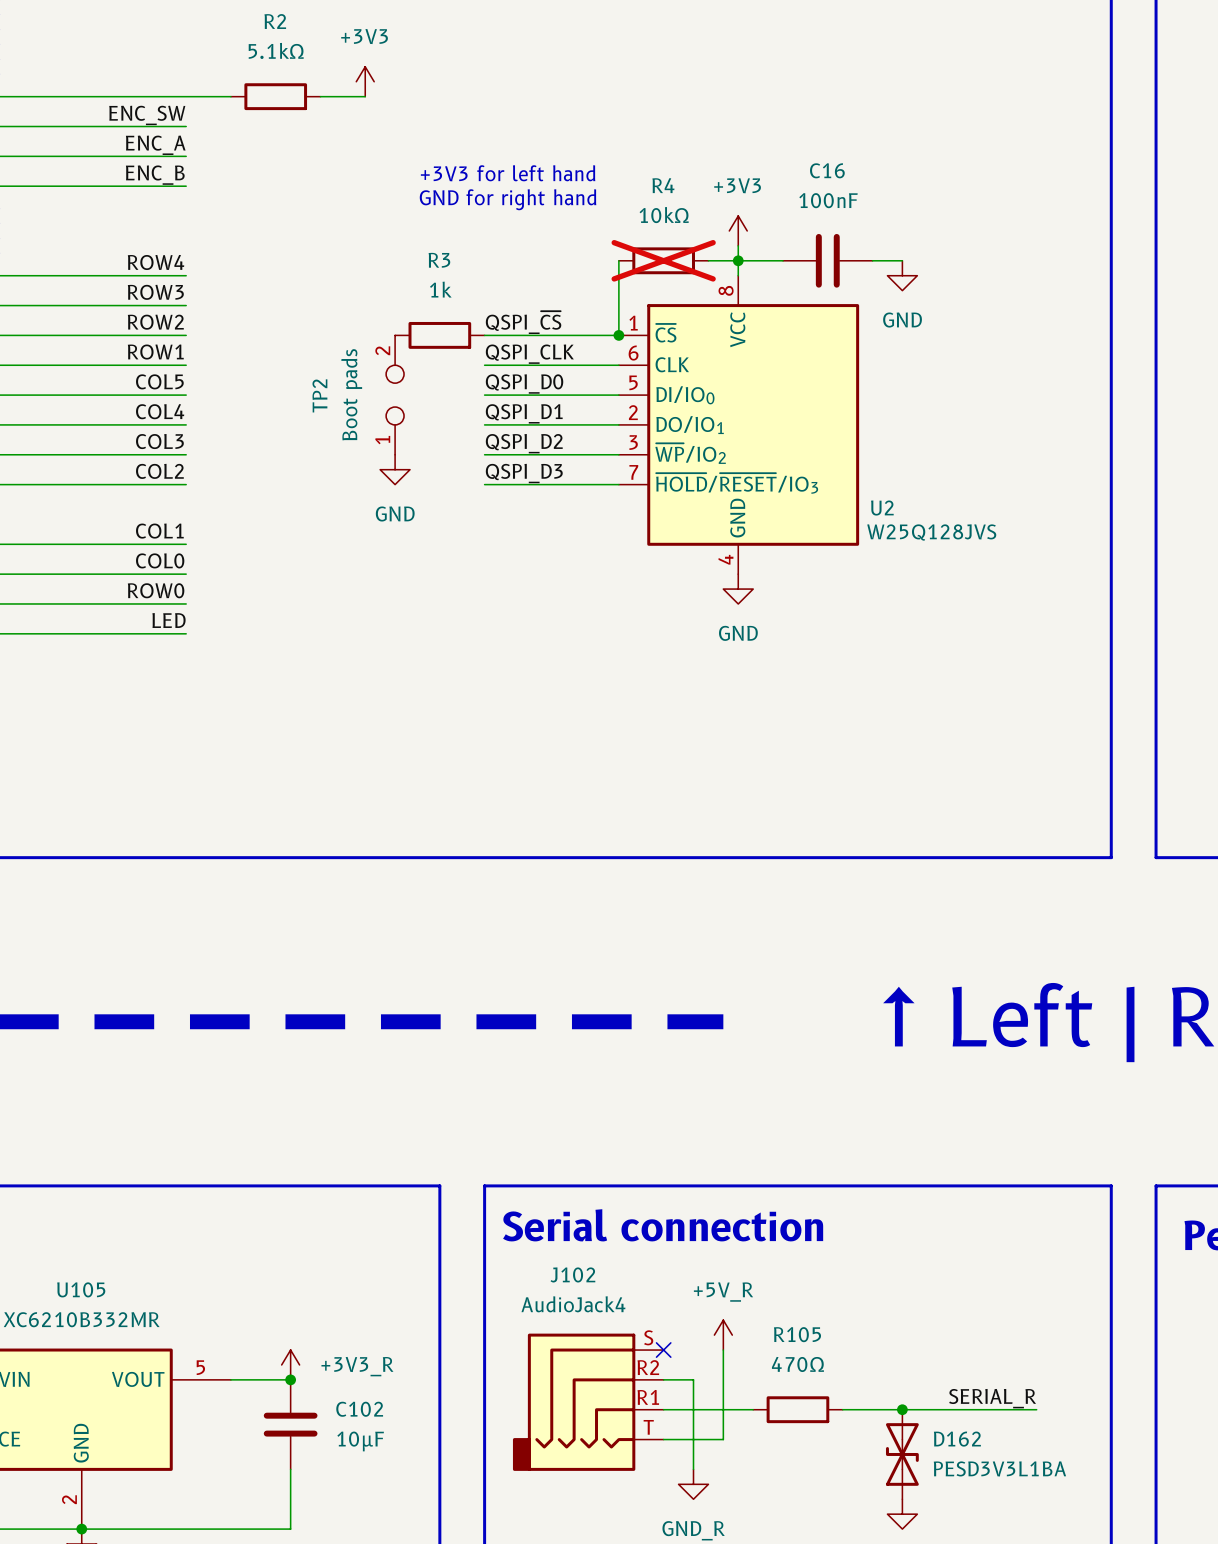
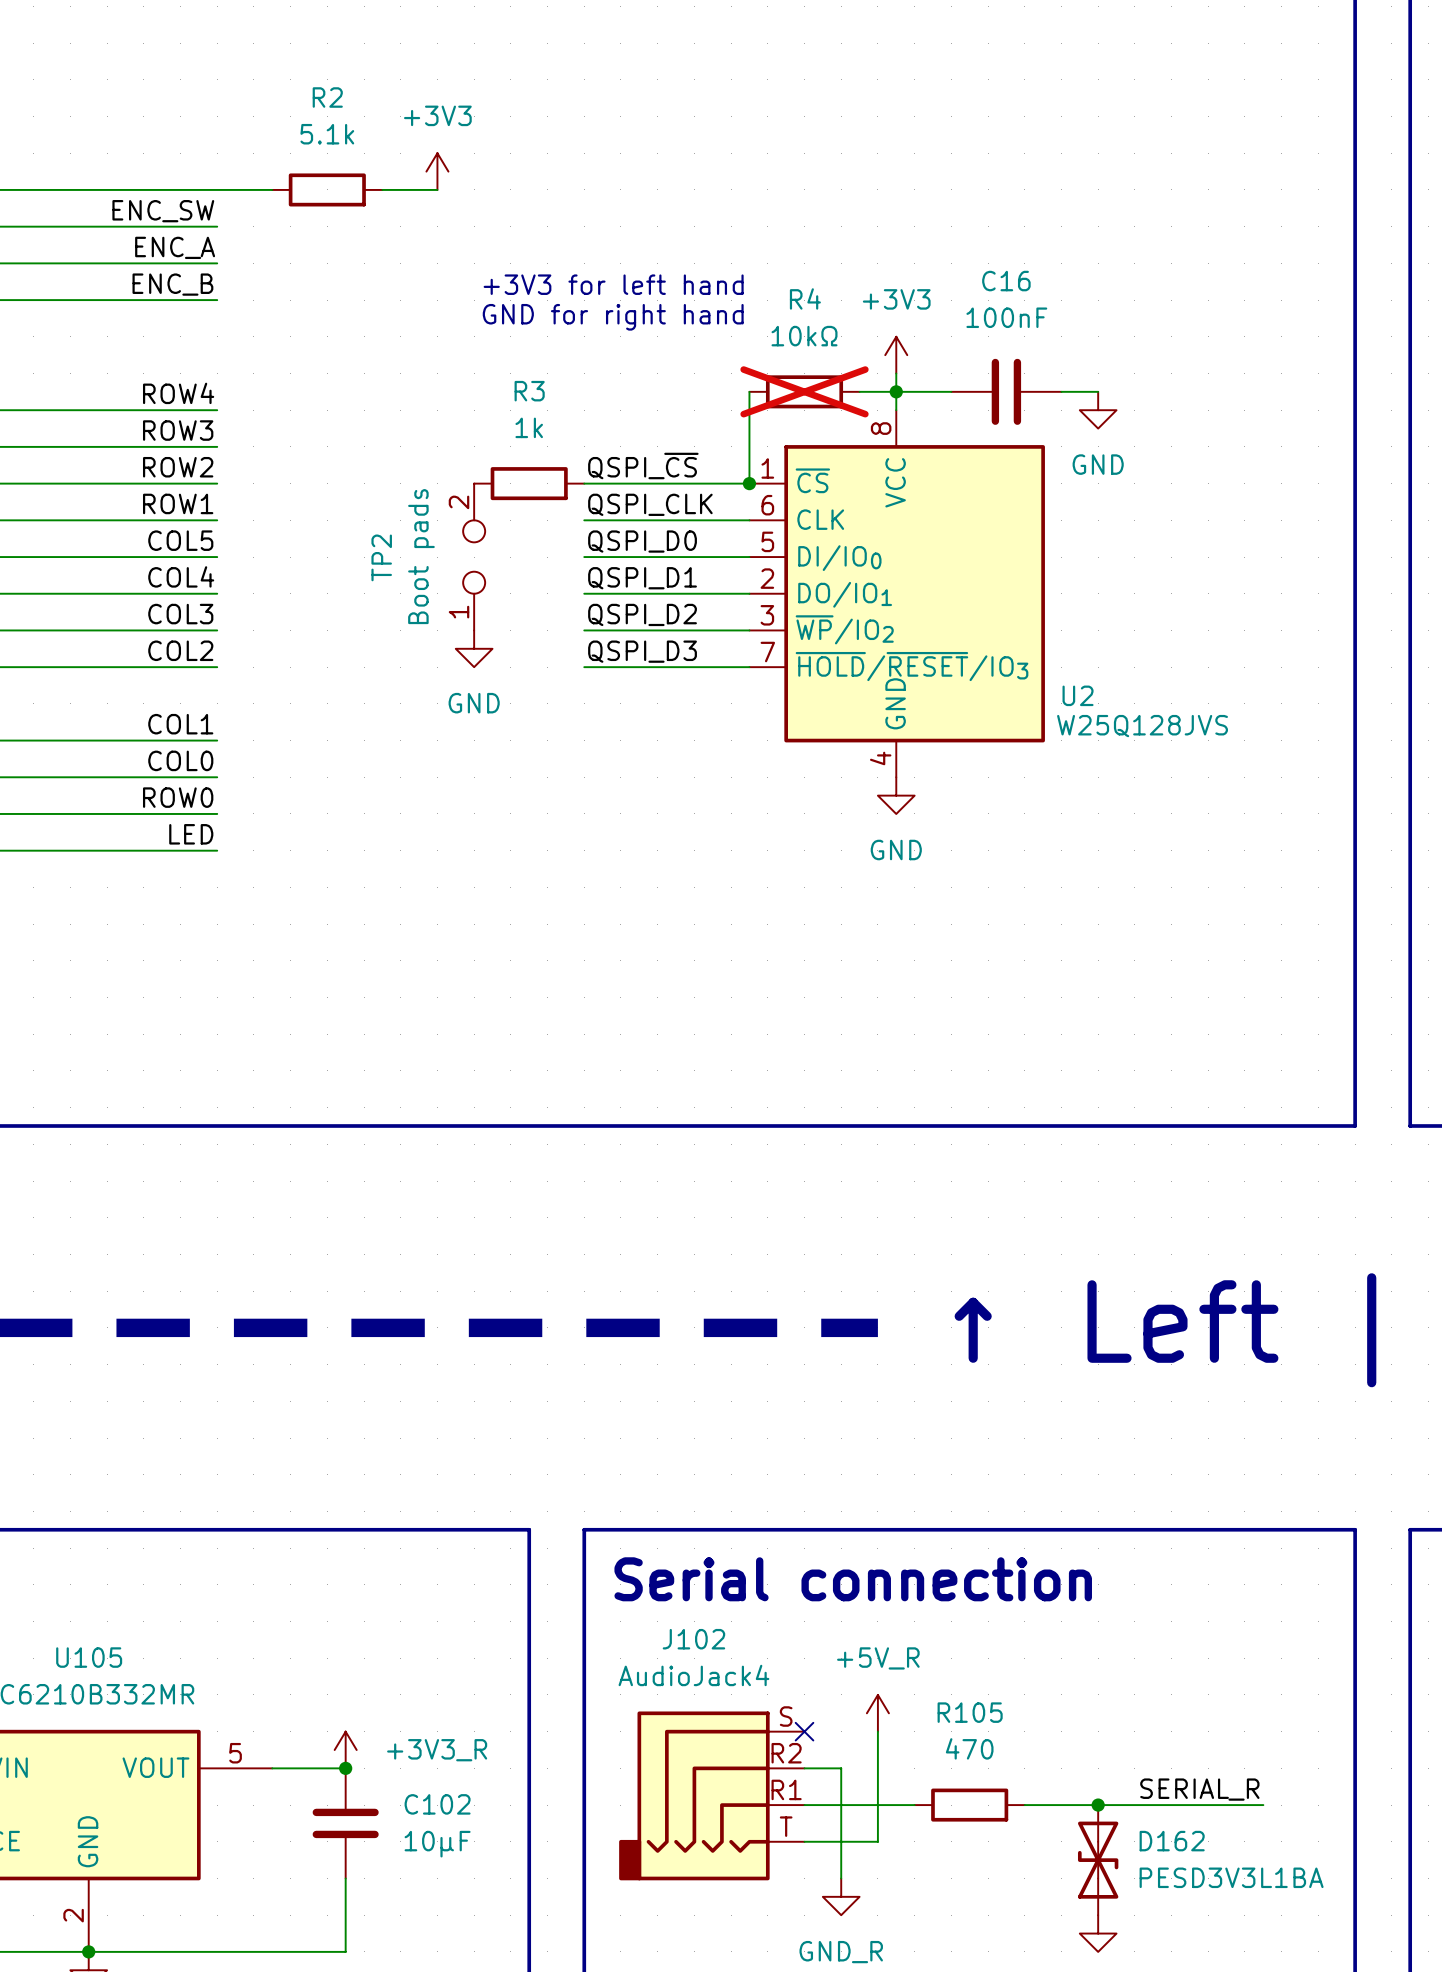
R2 value: 5.1kΩ (276, 50) -> 5.1k (327, 134)
R105 value: 470Ω (797, 1364) -> 470 (969, 1748)

